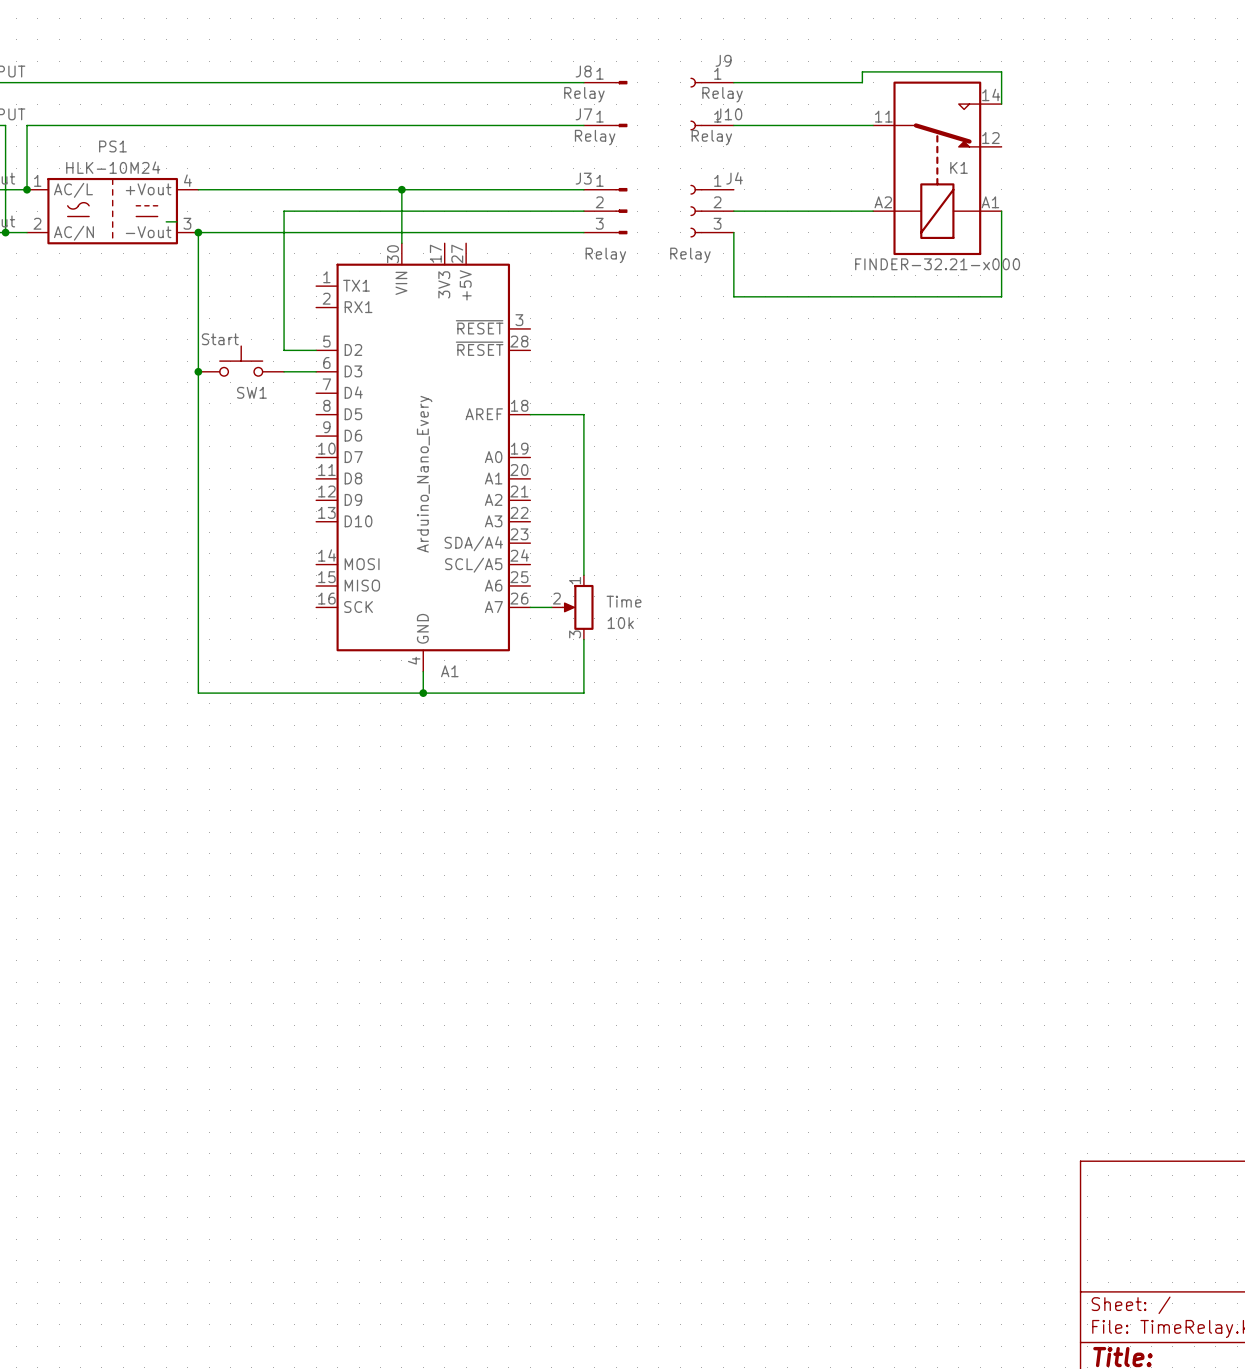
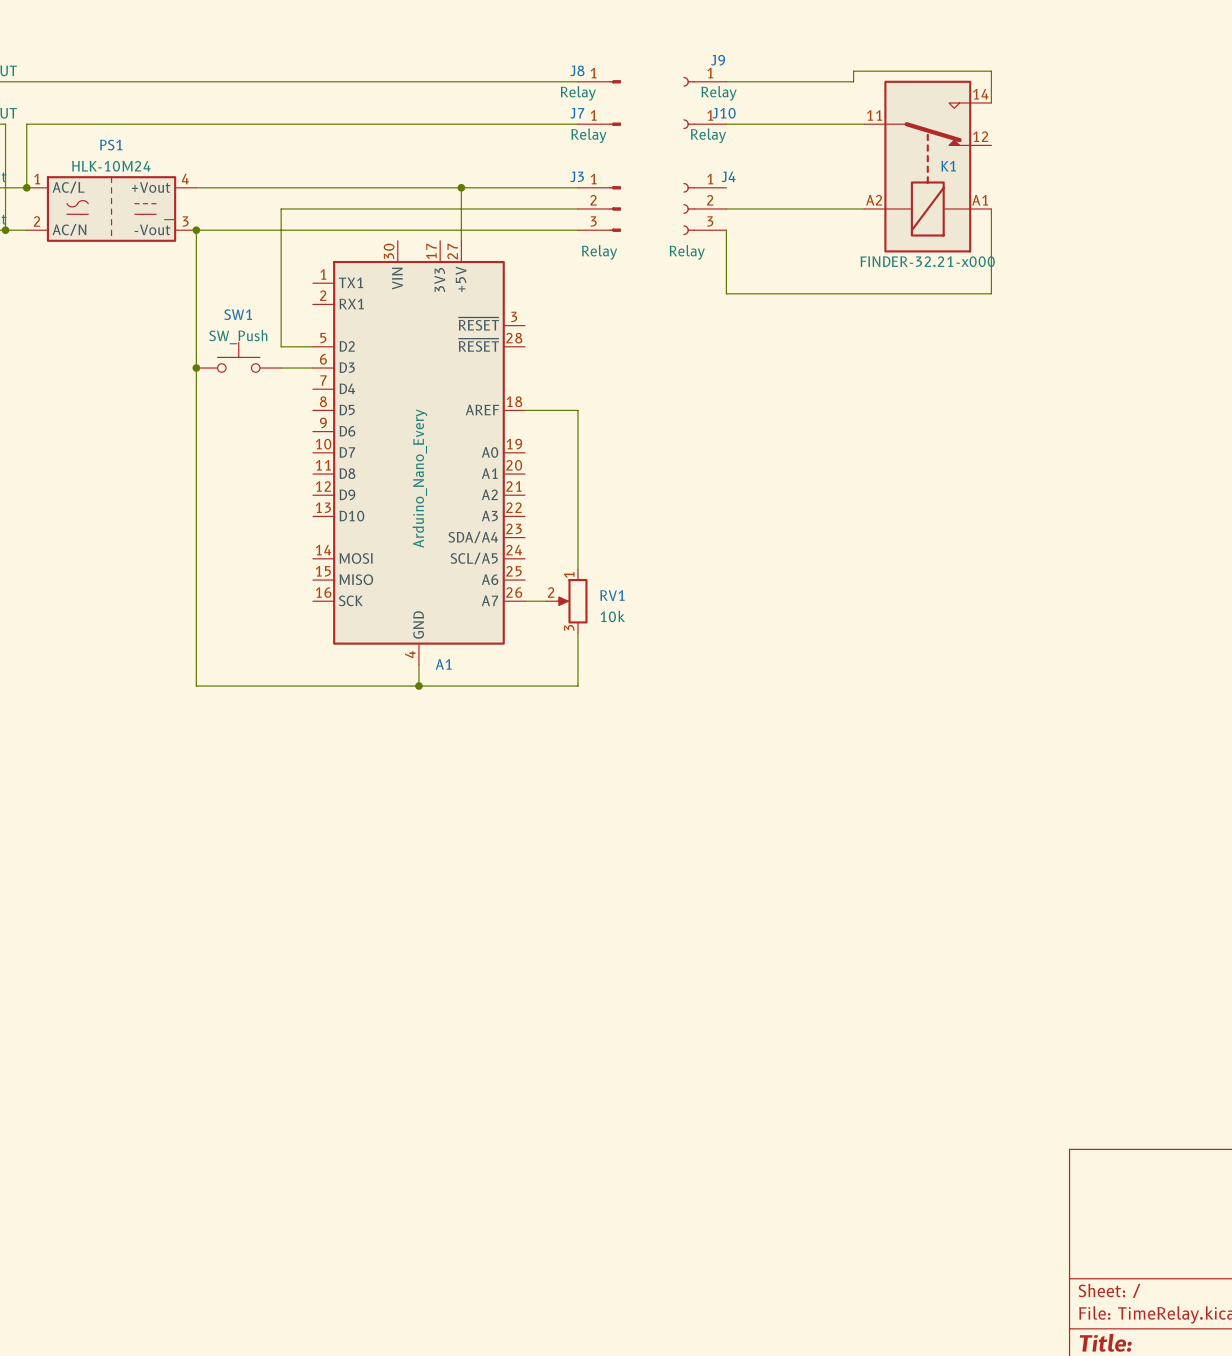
wire: (401, 189) (401, 243) -> (461, 187) (461, 240)
junction: (401, 189) -> none
junction: none -> (461, 187)
SW1 value: Start (220, 339) -> SW_Push (238, 337)
SW1 name position: SW1 (251, 392) -> SW1 (238, 314)
Time name: Time (624, 601) -> RV1 (612, 595)

